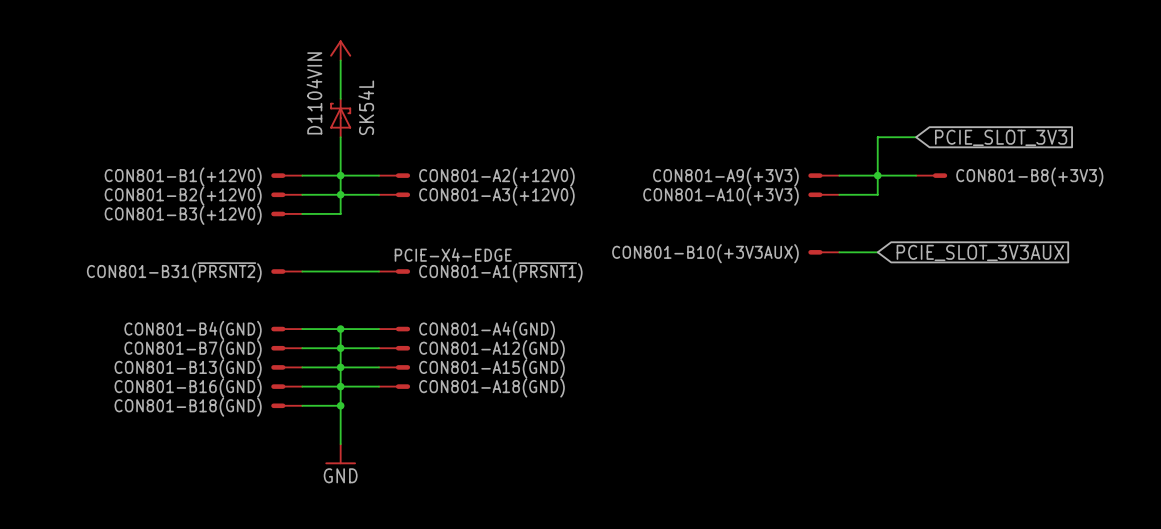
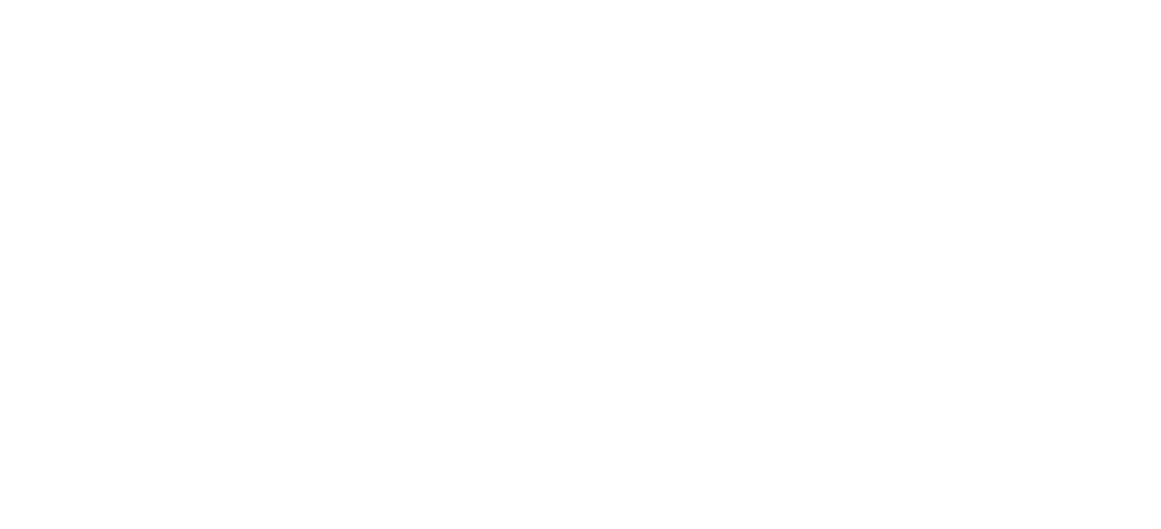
power symbol: VIN (340, 50) -> none
wire: (340, 60) (340, 98) -> none
D1104: SK54L (340, 118) -> none
wire: (340, 137) (340, 213) (302, 213) -> none
wire: (916, 137) (877, 137) (877, 194) (839, 194) -> none
global label: PCIE_SLOT_3V3 (1001, 137) -> none
CON801-B1(+12V0): (286, 175) -> none
wire: (302, 175) (379, 175) -> none
junction: (340, 175) -> none
CON801-A2(+12V0): (394, 175) -> none
CON801-A9(+3V3): (823, 175) -> none
wire: (839, 175) (916, 175) -> none
junction: (877, 175) -> none
CON801-B8(+3V3): (931, 175) -> none
CON801-B2(+12V0): (286, 194) -> none
wire: (302, 194) (379, 194) -> none
junction: (340, 194) -> none
CON801-A3(+12V0): (394, 194) -> none
CON801-A10(+3V3): (823, 194) -> none
CON801-B3(+12V0): (286, 213) -> none
CON801-B10(+3V3AUX): (823, 252) -> none
wire: (839, 252) (877, 252) -> none
global label: PCIE_SLOT_3V3AUX (980, 252) -> none
CON801-B31(~{PRSNT2}): (286, 271) -> none
wire: (302, 271) (379, 271) -> none
CON801-A1(~{PRSNT1}): PCIE-X4-EDGE (394, 271) -> none
CON801-B4(GND): (286, 329) -> none
wire: (302, 329) (379, 329) -> none
wire: (340, 329) (340, 444) -> none
junction: (340, 329) -> none
CON801-A4(GND): (394, 329) -> none
CON801-B7(GND): (286, 348) -> none
wire: (302, 348) (379, 348) -> none
junction: (340, 348) -> none
CON801-A12(GND): (394, 348) -> none
CON801-B13(GND): (286, 367) -> none
wire: (302, 367) (379, 367) -> none
junction: (340, 367) -> none
CON801-A15(GND): (394, 367) -> none
CON801-B16(GND): (286, 386) -> none
wire: (302, 386) (379, 386) -> none
junction: (340, 386) -> none
CON801-A18(GND): (394, 386) -> none
CON801-B18(GND): (286, 405) -> none
wire: (302, 405) (340, 405) -> none
junction: (340, 405) -> none
power symbol: GND (340, 454) -> none

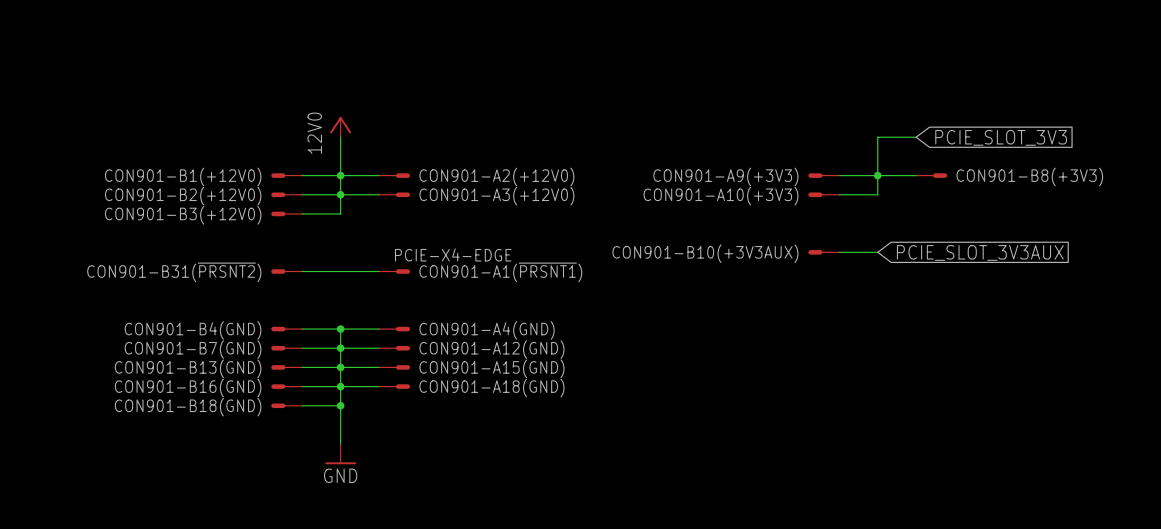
power symbol: none -> 12V0 (340, 127)
wire: none -> (340, 137) (340, 213) (302, 213)
wire: none -> (916, 137) (877, 137) (877, 194) (839, 194)
global label: none -> PCIE_SLOT_3V3 (1001, 137)
CON901-B1(+12V0): none -> (286, 175)
wire: none -> (302, 175) (379, 175)
junction: none -> (340, 175)
CON901-A2(+12V0): none -> (394, 175)
CON901-A9(+3V3): none -> (823, 175)
wire: none -> (839, 175) (916, 175)
junction: none -> (877, 175)
CON901-B8(+3V3): none -> (931, 175)
CON901-B2(+12V0): none -> (286, 194)
wire: none -> (302, 194) (379, 194)
junction: none -> (340, 194)
CON901-A3(+12V0): none -> (394, 194)
CON901-A10(+3V3): none -> (823, 194)
CON901-B3(+12V0): none -> (286, 213)
CON901-B10(+3V3AUX): none -> (823, 252)
wire: none -> (839, 252) (877, 252)
global label: none -> PCIE_SLOT_3V3AUX (980, 252)
CON901-B31(~{PRSNT2}): none -> (286, 271)
wire: none -> (302, 271) (379, 271)
CON901-A1(~{PRSNT1}): none -> PCIE-X4-EDGE (394, 271)
CON901-B4(GND): none -> (286, 329)
wire: none -> (302, 329) (379, 329)
wire: none -> (340, 329) (340, 444)
junction: none -> (340, 329)
CON901-A4(GND): none -> (394, 329)
CON901-B7(GND): none -> (286, 348)
wire: none -> (302, 348) (379, 348)
junction: none -> (340, 348)
CON901-A12(GND): none -> (394, 348)
CON901-B13(GND): none -> (286, 367)
wire: none -> (302, 367) (379, 367)
junction: none -> (340, 367)
CON901-A15(GND): none -> (394, 367)
CON901-B16(GND): none -> (286, 386)
wire: none -> (302, 386) (379, 386)
junction: none -> (340, 386)
CON901-A18(GND): none -> (394, 386)
CON901-B18(GND): none -> (286, 405)
wire: none -> (302, 405) (340, 405)
junction: none -> (340, 405)
power symbol: none -> GND (340, 454)

